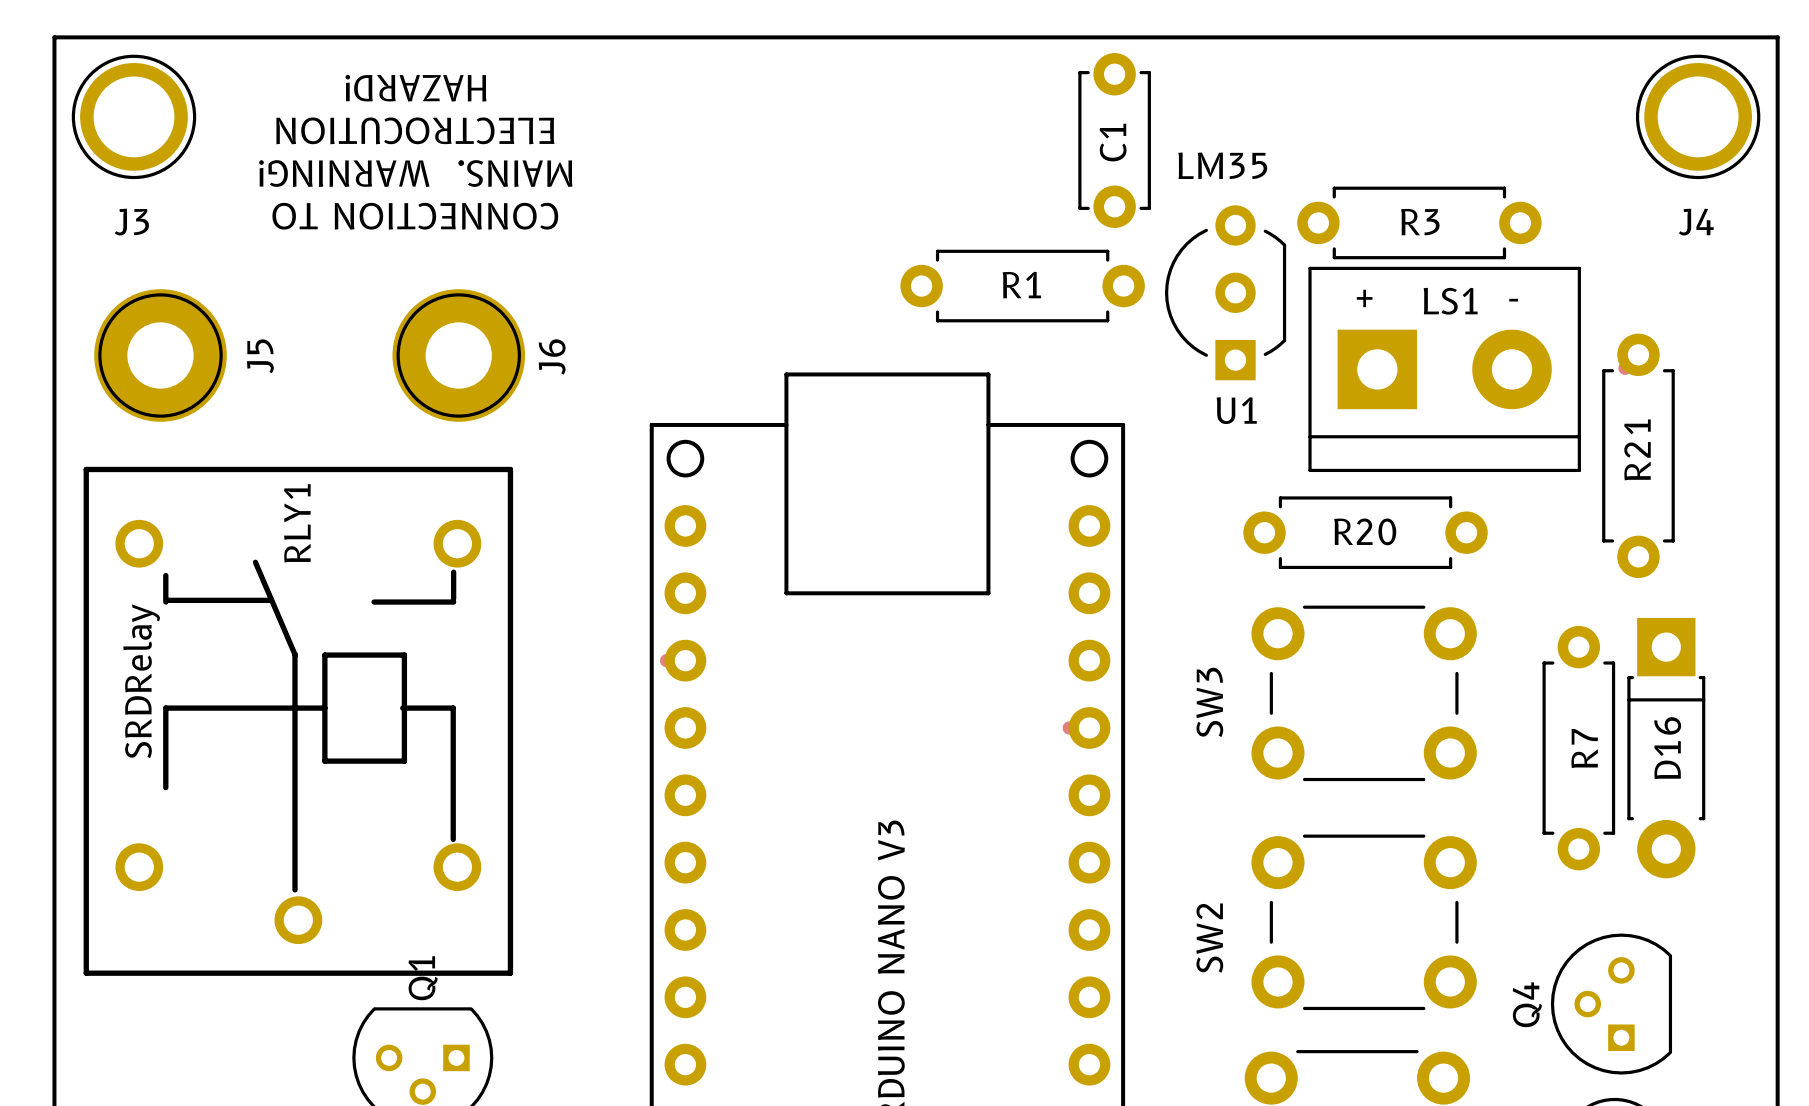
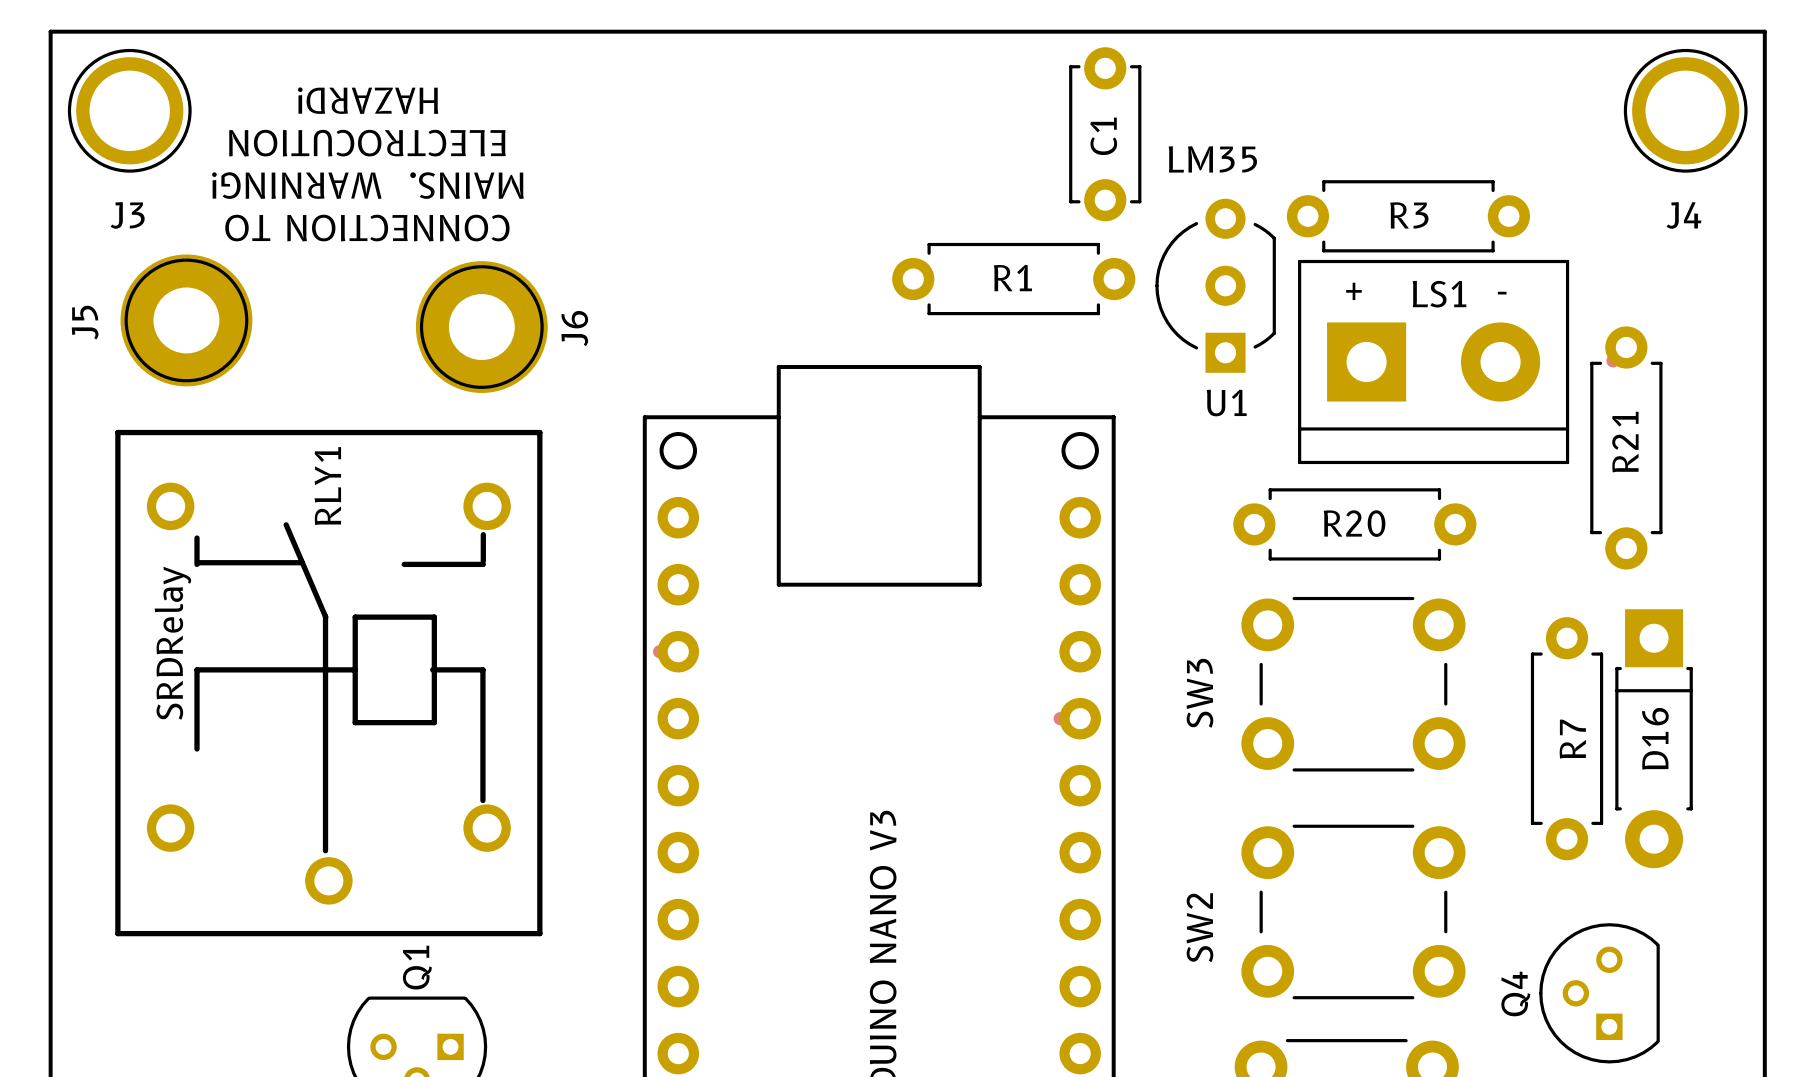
text position: HAZARD! (416, 88) -> HAZARD! (368, 100)
text position: ELECTROCUTION (415, 130) -> ELECTROCUTION (367, 143)
text position: MAINS. WARNING! (415, 173) -> MAINS. WARNING! (367, 185)
text position: CONNECTION TO (415, 216) -> CONNECTION TO (367, 228)
J5 position: (160, 355) -> (186, 320)
J6 position: (458, 355) -> (481, 327)
J5 name position: J5 (260, 356) -> J5 (85, 322)
RLY1 position: (298, 721) -> (328, 683)

